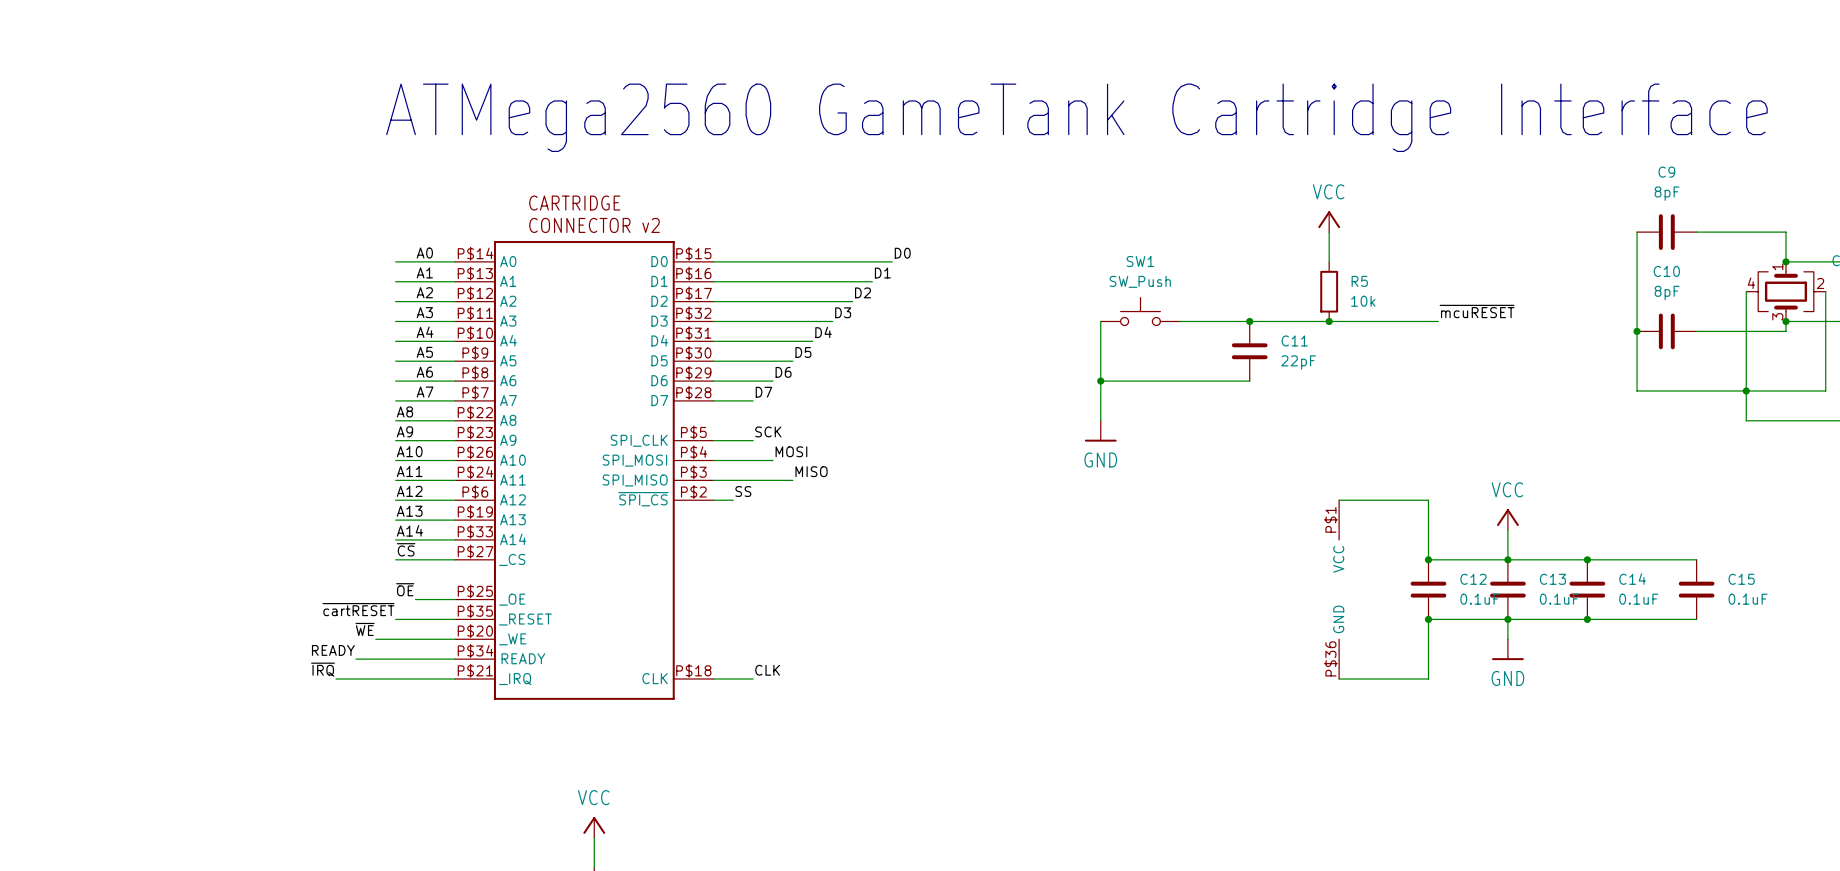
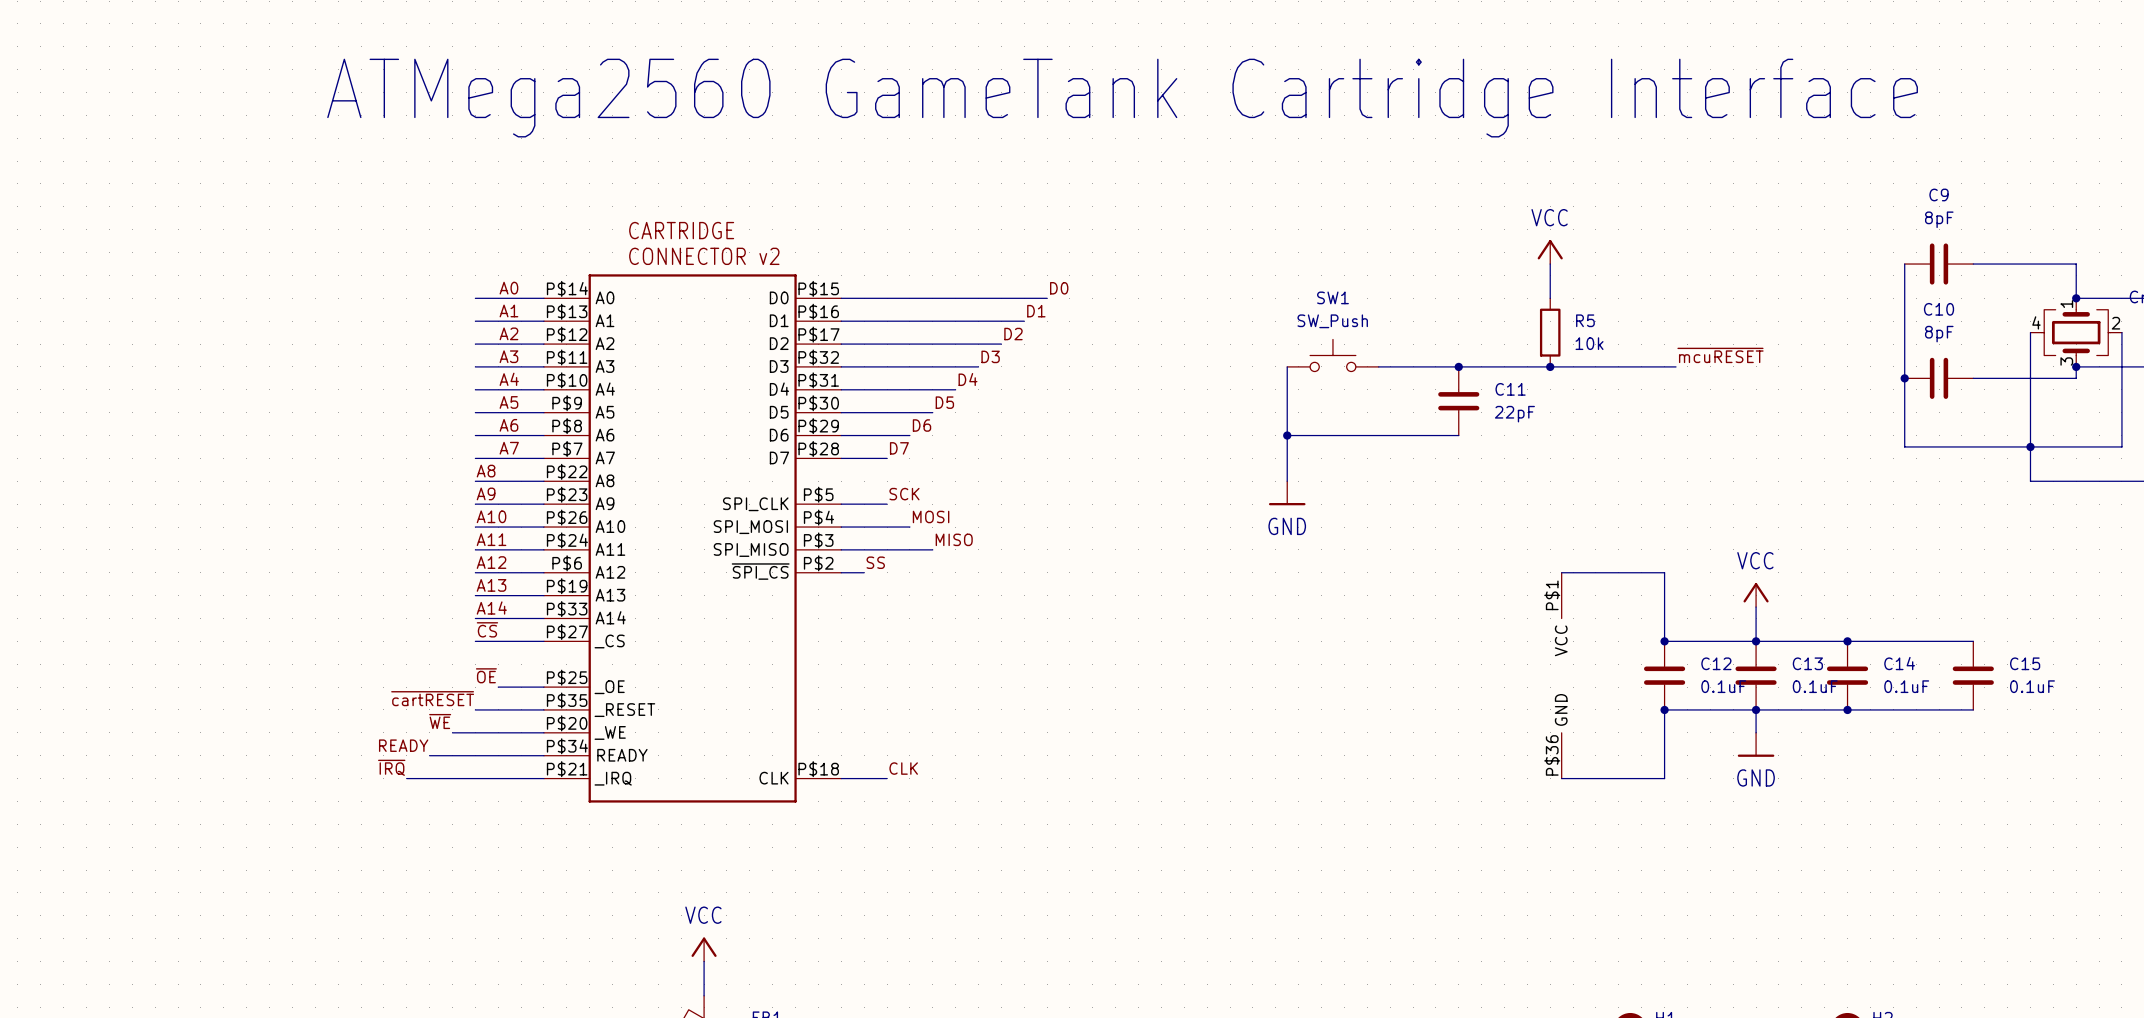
text position: ATMega2560 GameTank Cartridge Interface (1076, 117) -> ATMega2560 GameTank Cartridge Interface (1122, 98)

